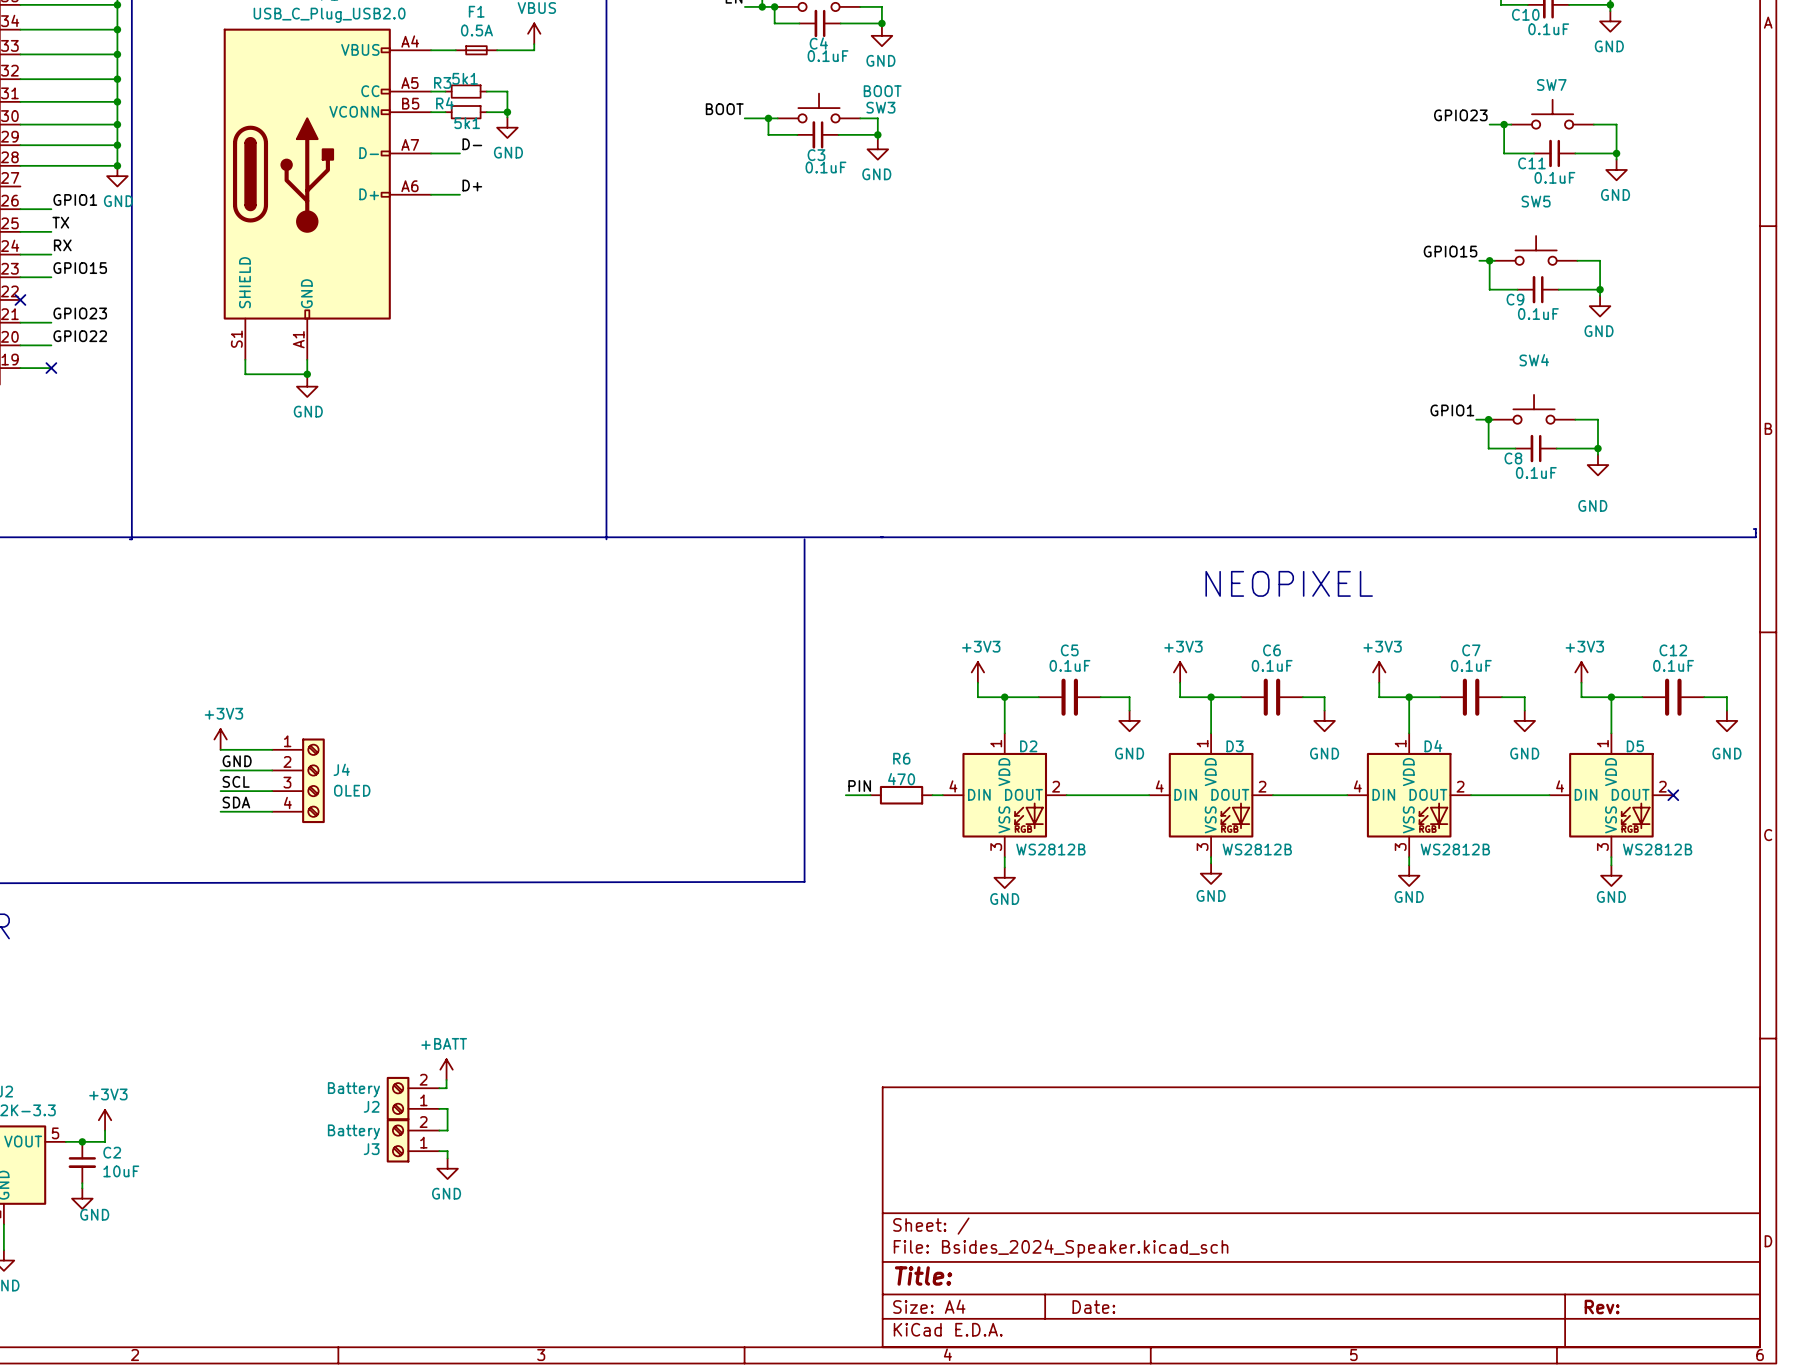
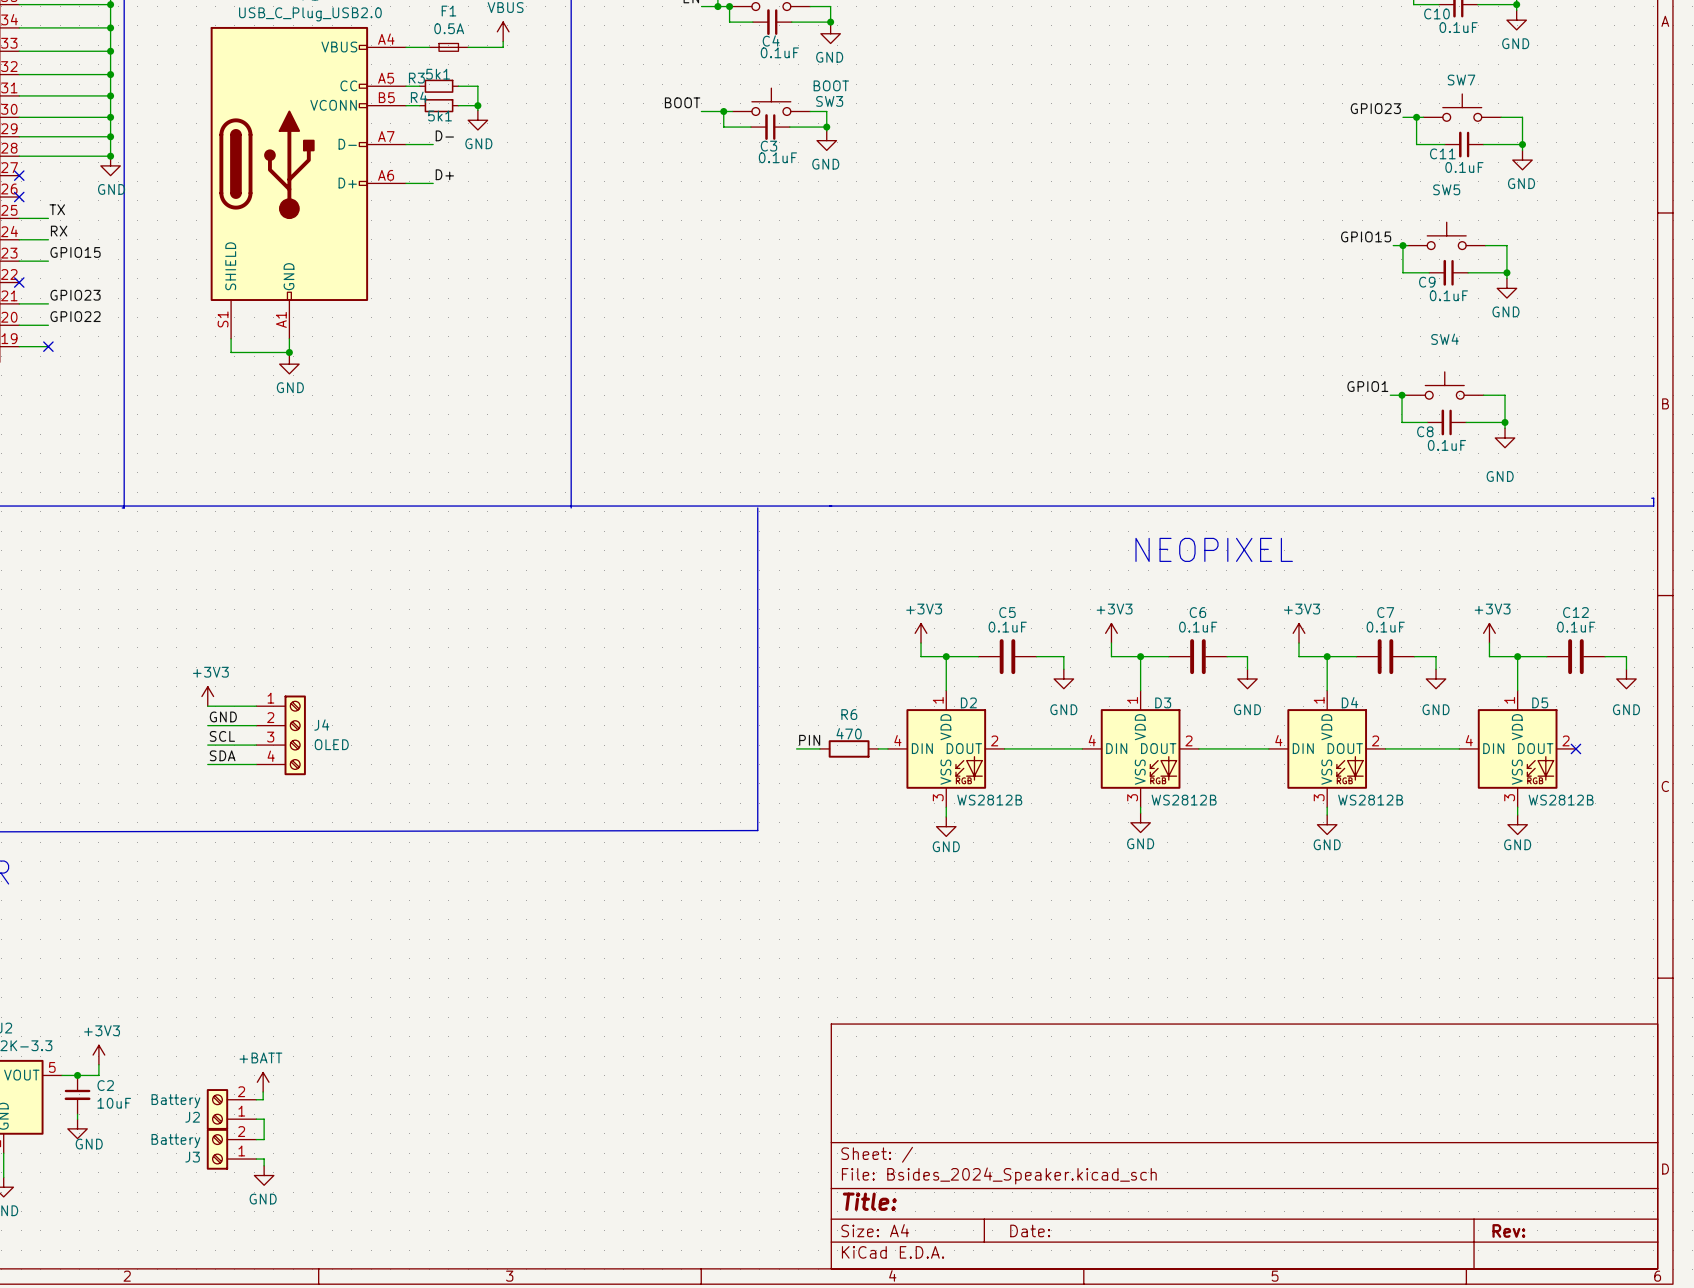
no-connect mark: none -> (19, 175)
label: GPIO1 (75, 199) -> none
wire: (20, 209) (51, 209) -> none
no-connect mark: none -> (19, 197)
power symbol position: +BATT (446, 1069) -> +BATT (263, 1082)
wire: (446, 1079) (446, 1088) (439, 1088) -> (263, 1091) (263, 1099) (256, 1099)
J2 position: (413, 1098) -> (231, 1109)
wire: (439, 1108) (447, 1108) (447, 1130) (439, 1130) -> (256, 1119) (264, 1119) (264, 1139) (256, 1139)
J3 position: (413, 1140) -> (231, 1149)
wire: (439, 1151) (447, 1151) (447, 1158) -> (256, 1159) (264, 1159) (264, 1165)
power symbol position: GND (447, 1168) -> GND (264, 1175)

